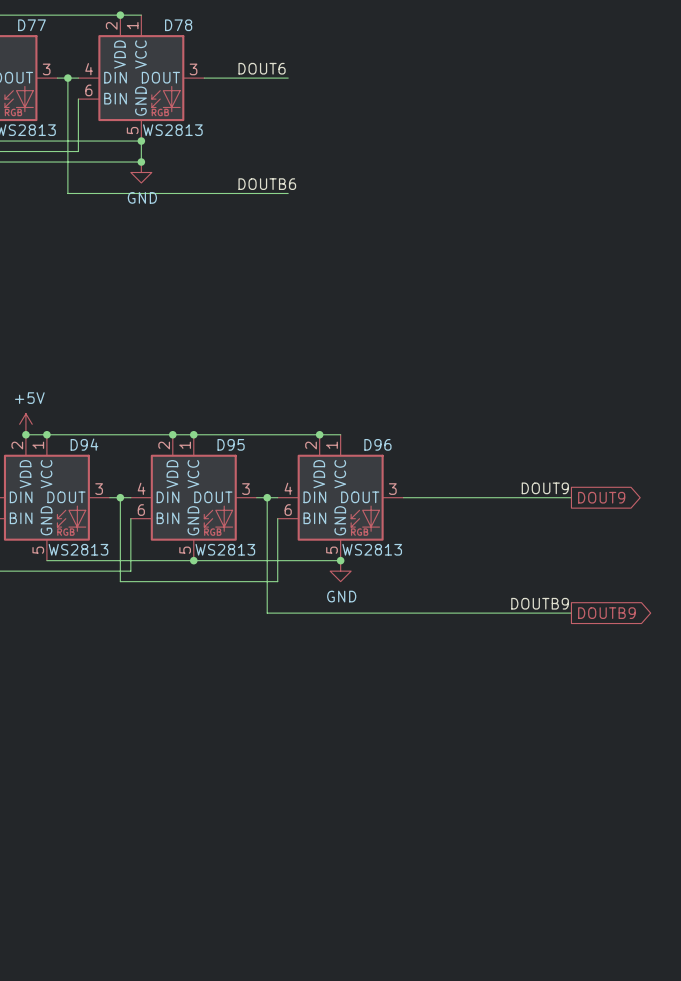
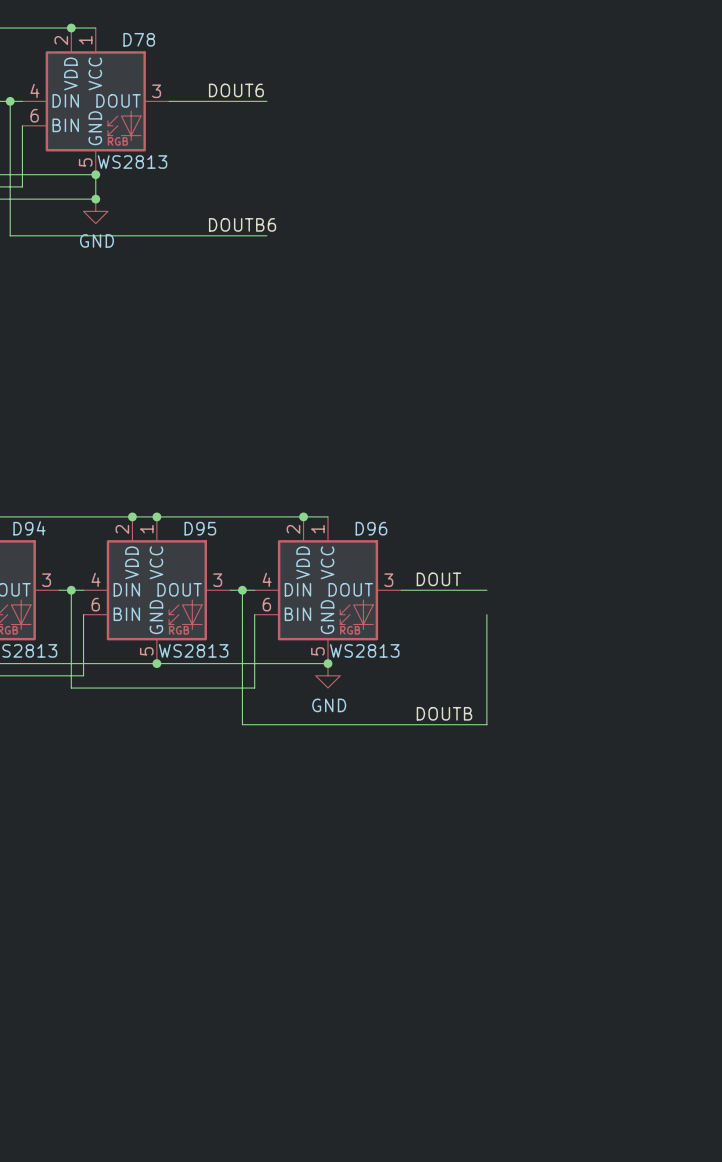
label: none -> DOUT (438, 579)
label: DOUT9 (545, 488) -> none
wire: (477, 497) (571, 497) -> none
global label: DOUT9 (601, 497) -> none
label: none -> DOUTB (444, 713)
label: DOUTB9 (540, 603) -> none
wire: (477, 613) (571, 613) -> (486, 724) (486, 614)
global label: DOUTB9 (606, 613) -> none

